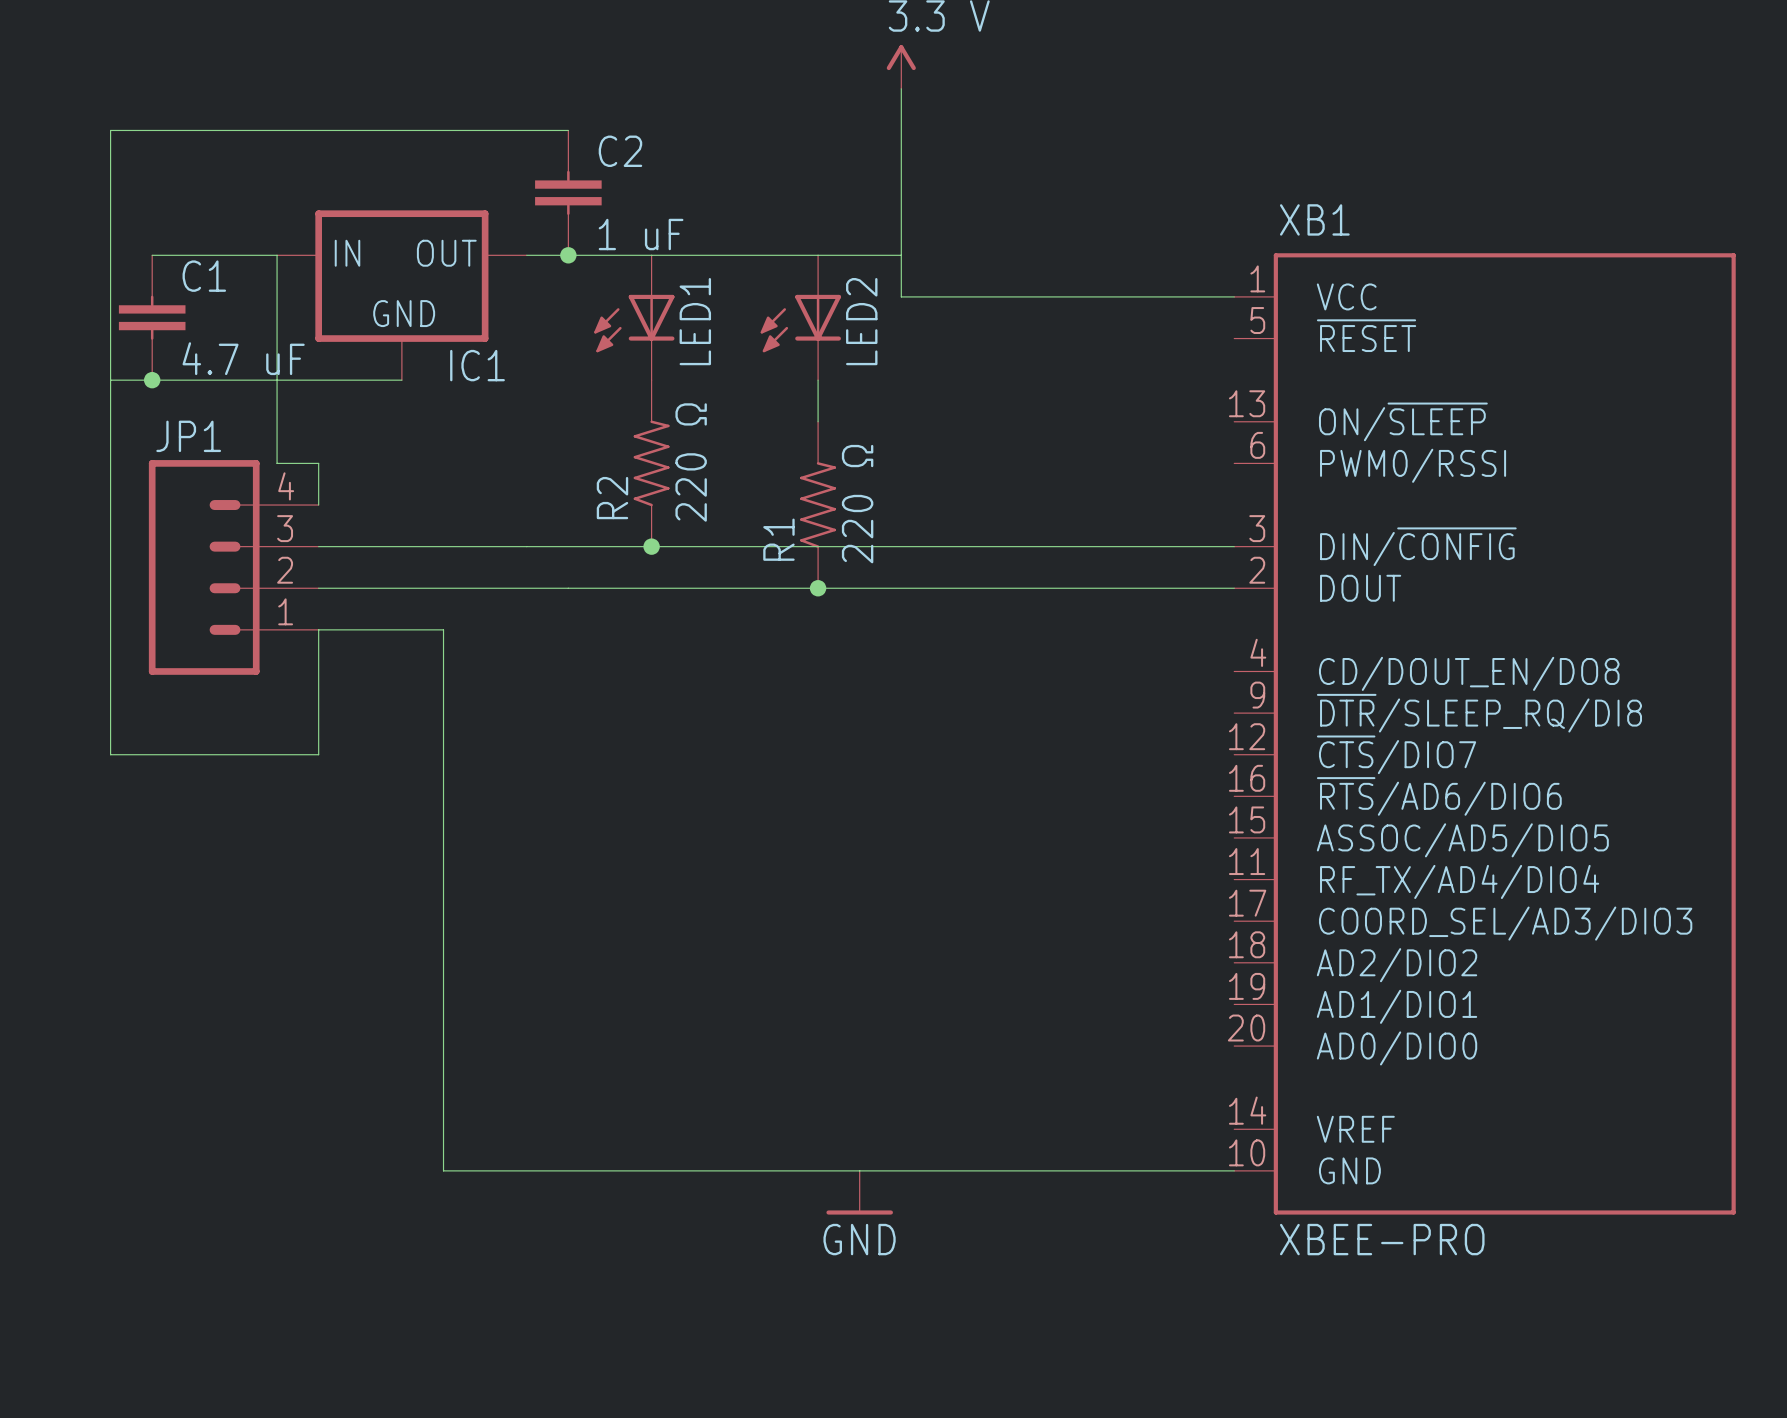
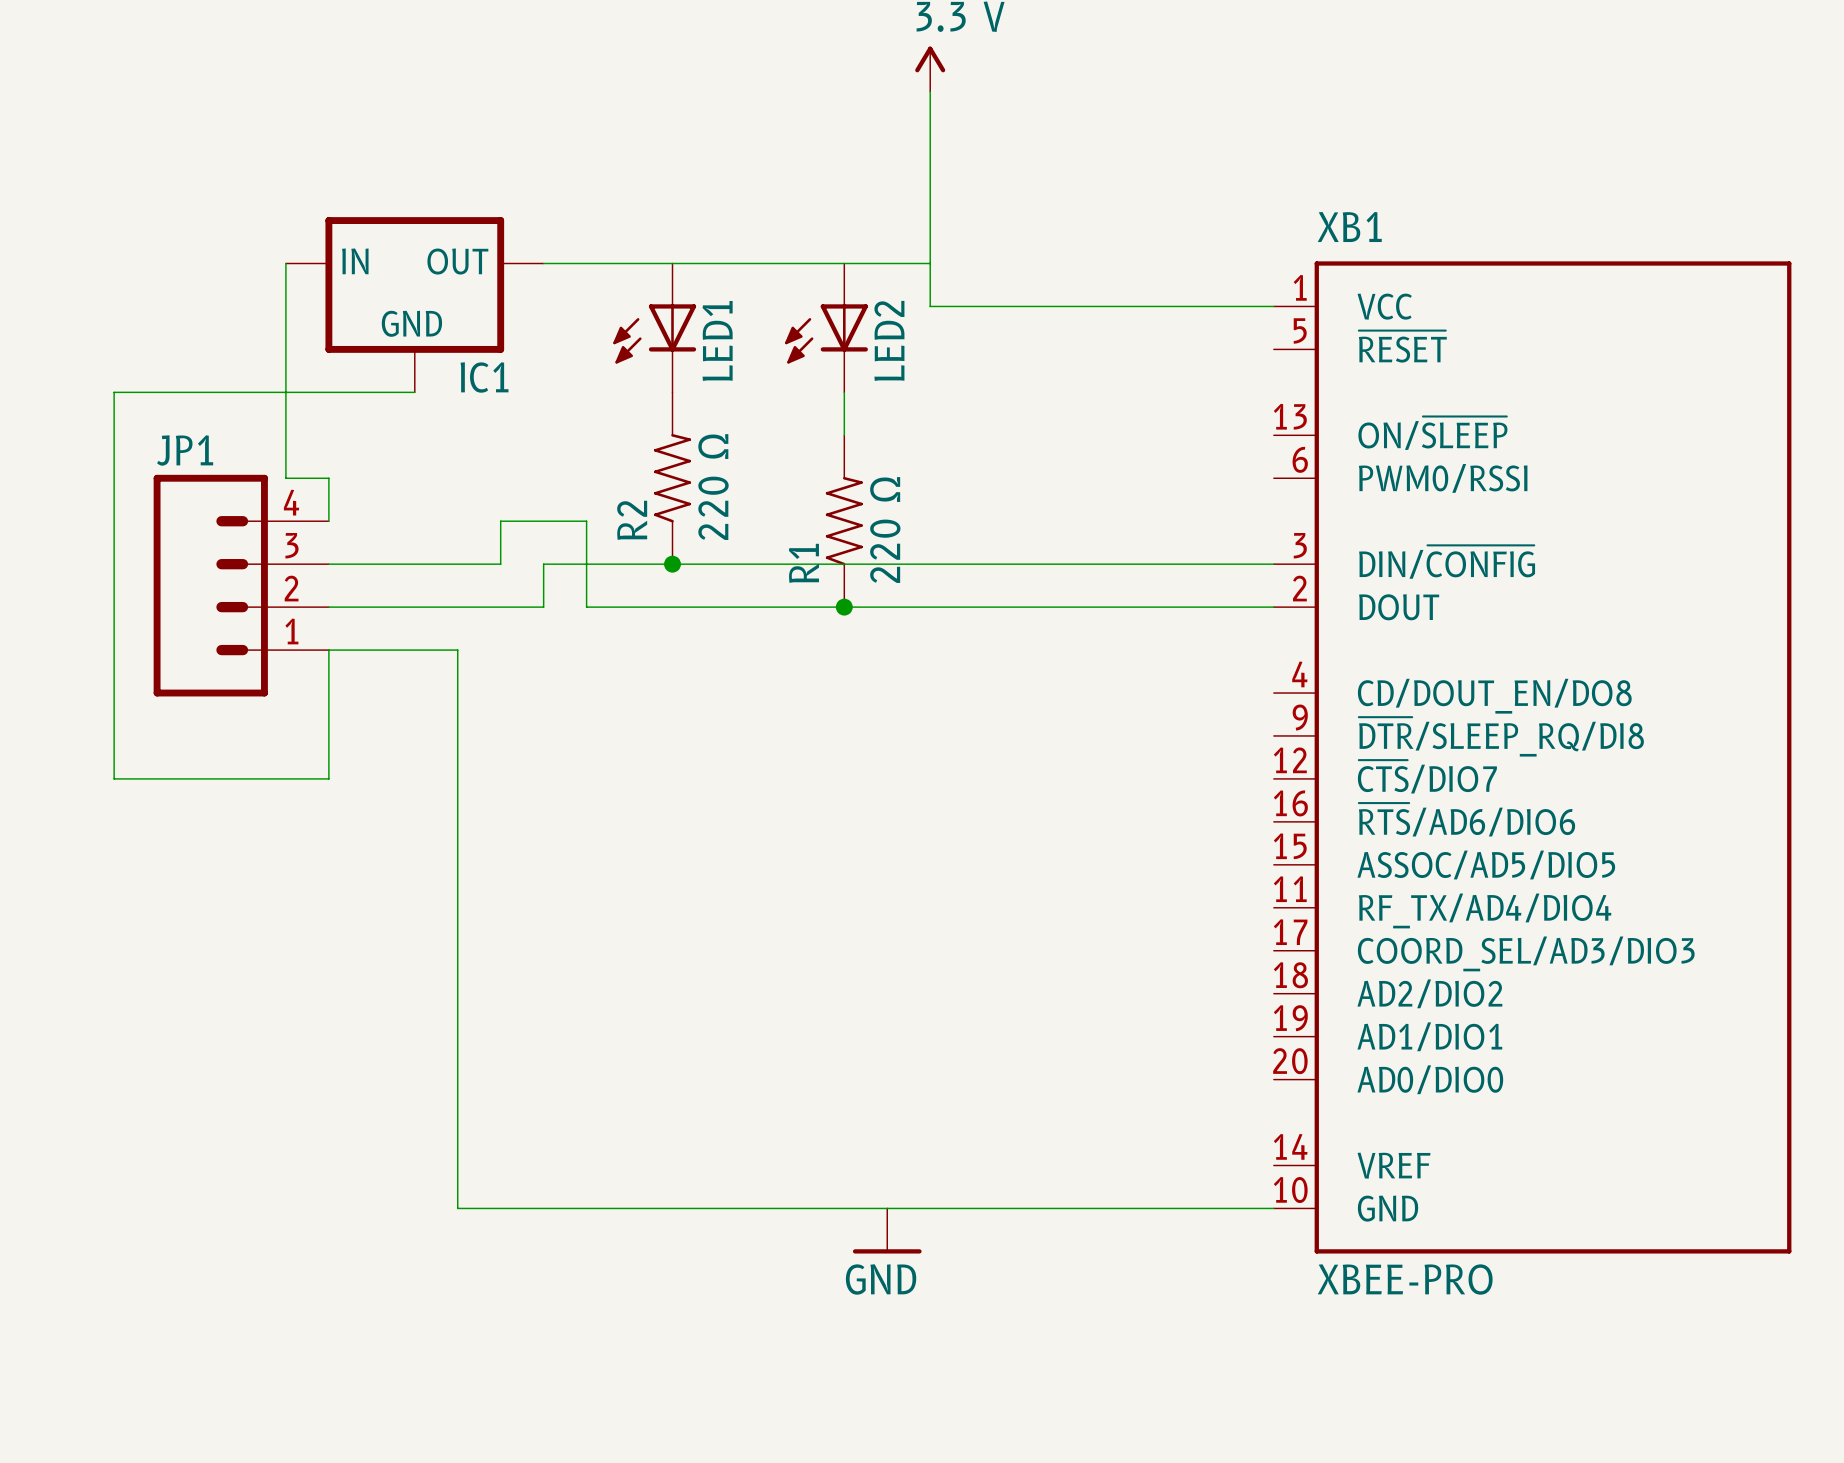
wire: (568, 130) (110, 130) (110, 380) -> none
C2: 1 uF (568, 192) -> none
wire: (152, 255) (277, 255) -> none
junction: (568, 255) -> none
C1: 4.7 uF (152, 317) -> none
junction: (152, 380) -> none
wire: (485, 546) (526, 546) -> (500, 564) (500, 521) (586, 521) (586, 607)
wire: (526, 588) (568, 588) -> (543, 607) (543, 564)

